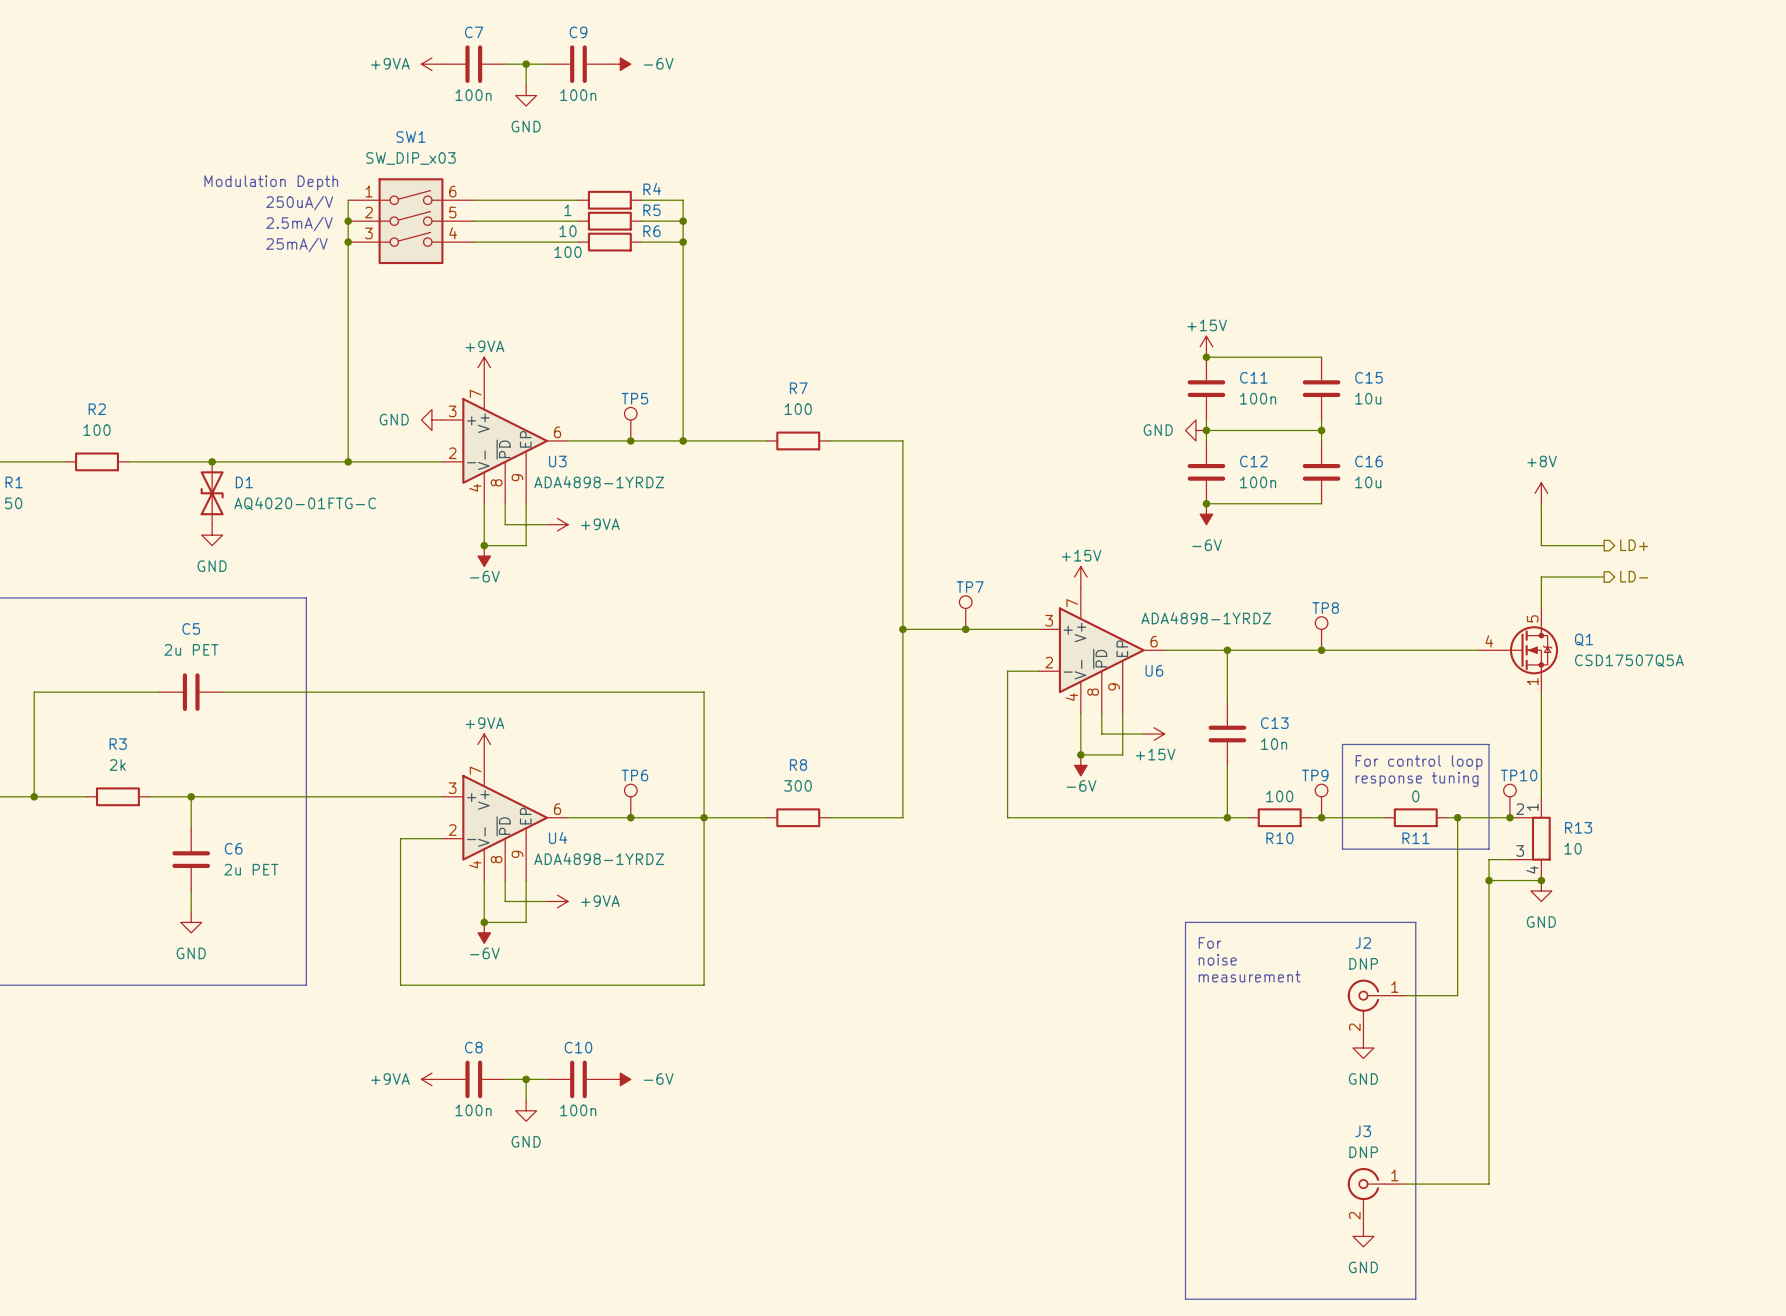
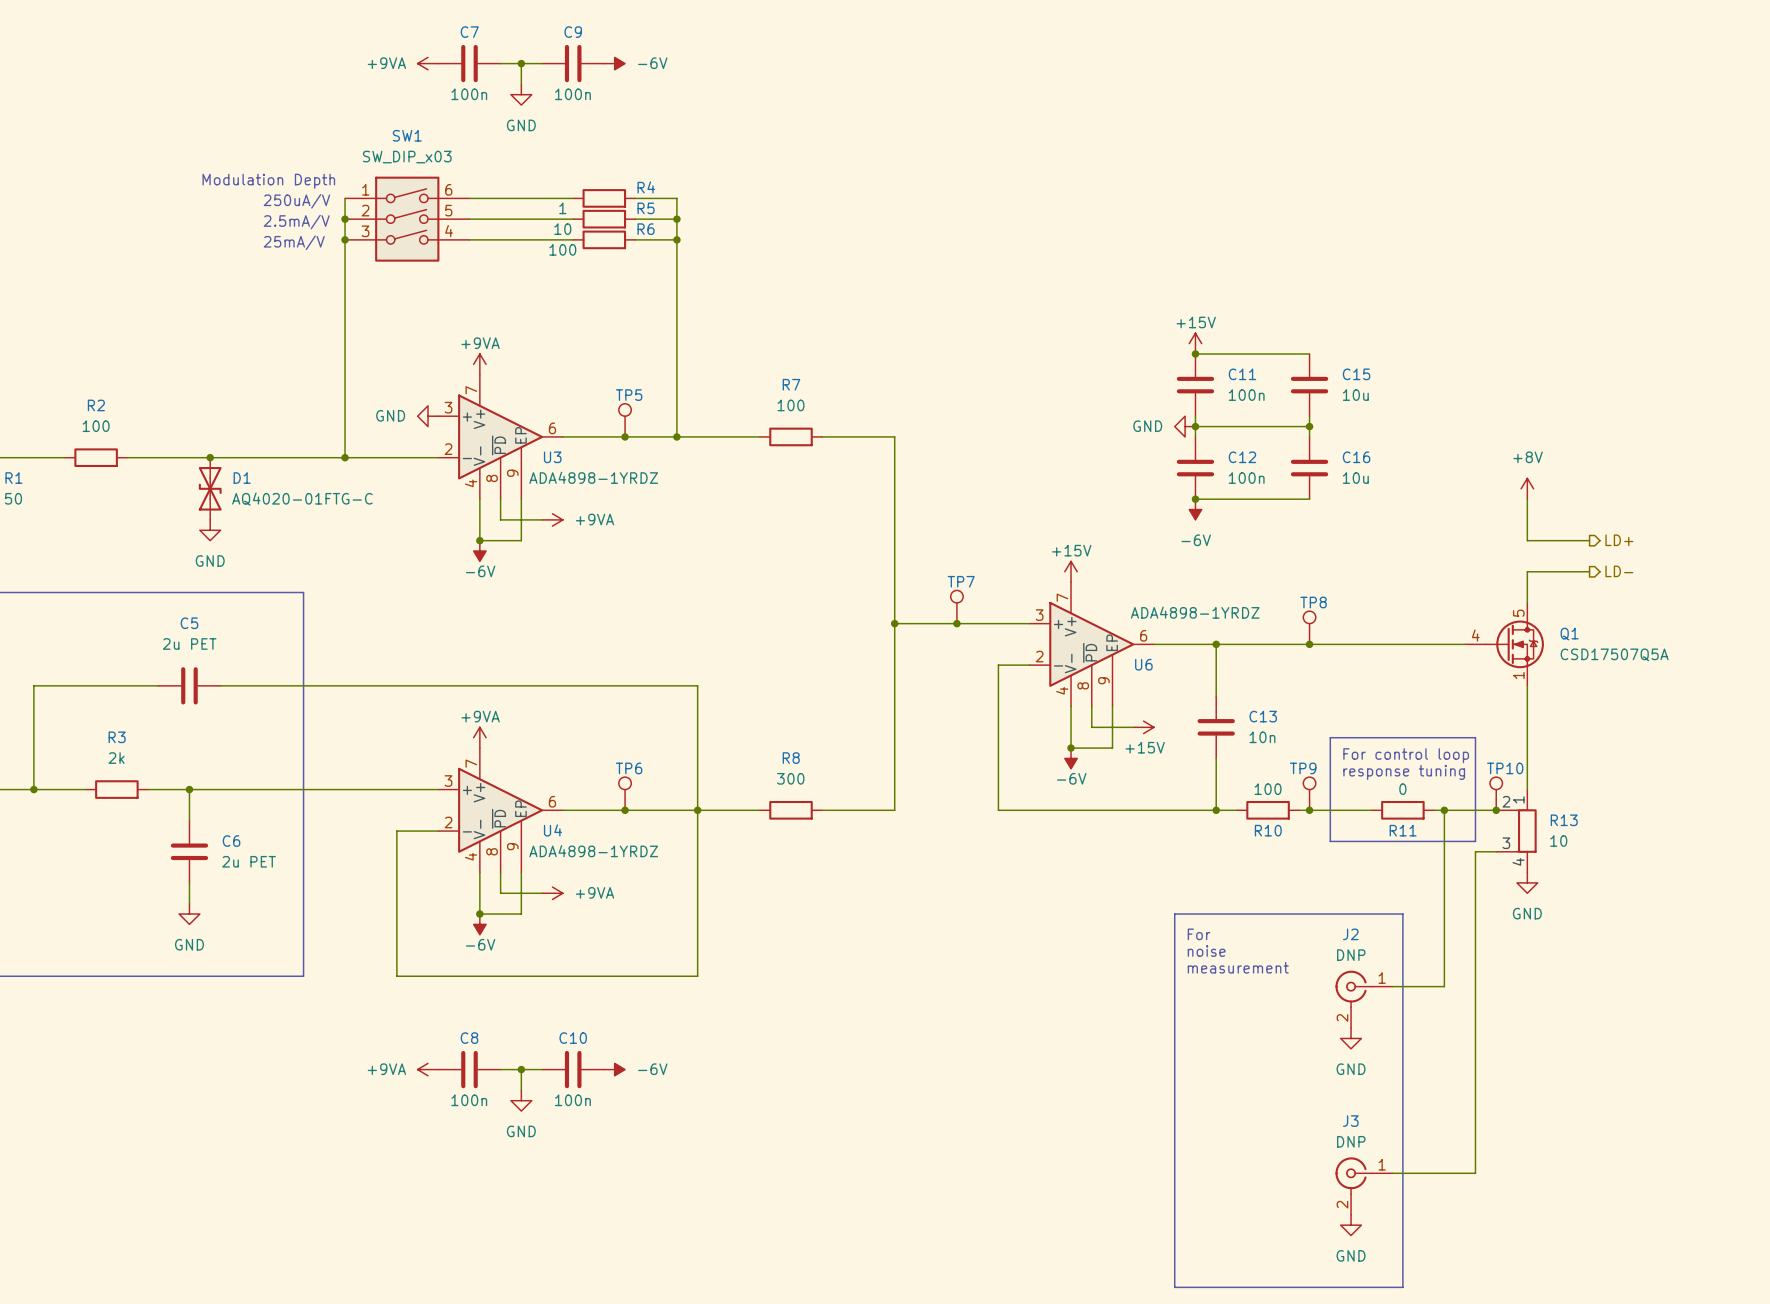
wire: (1489, 880) (1541, 880) -> none
junction: (1489, 880) -> none
junction: (1541, 880) -> none

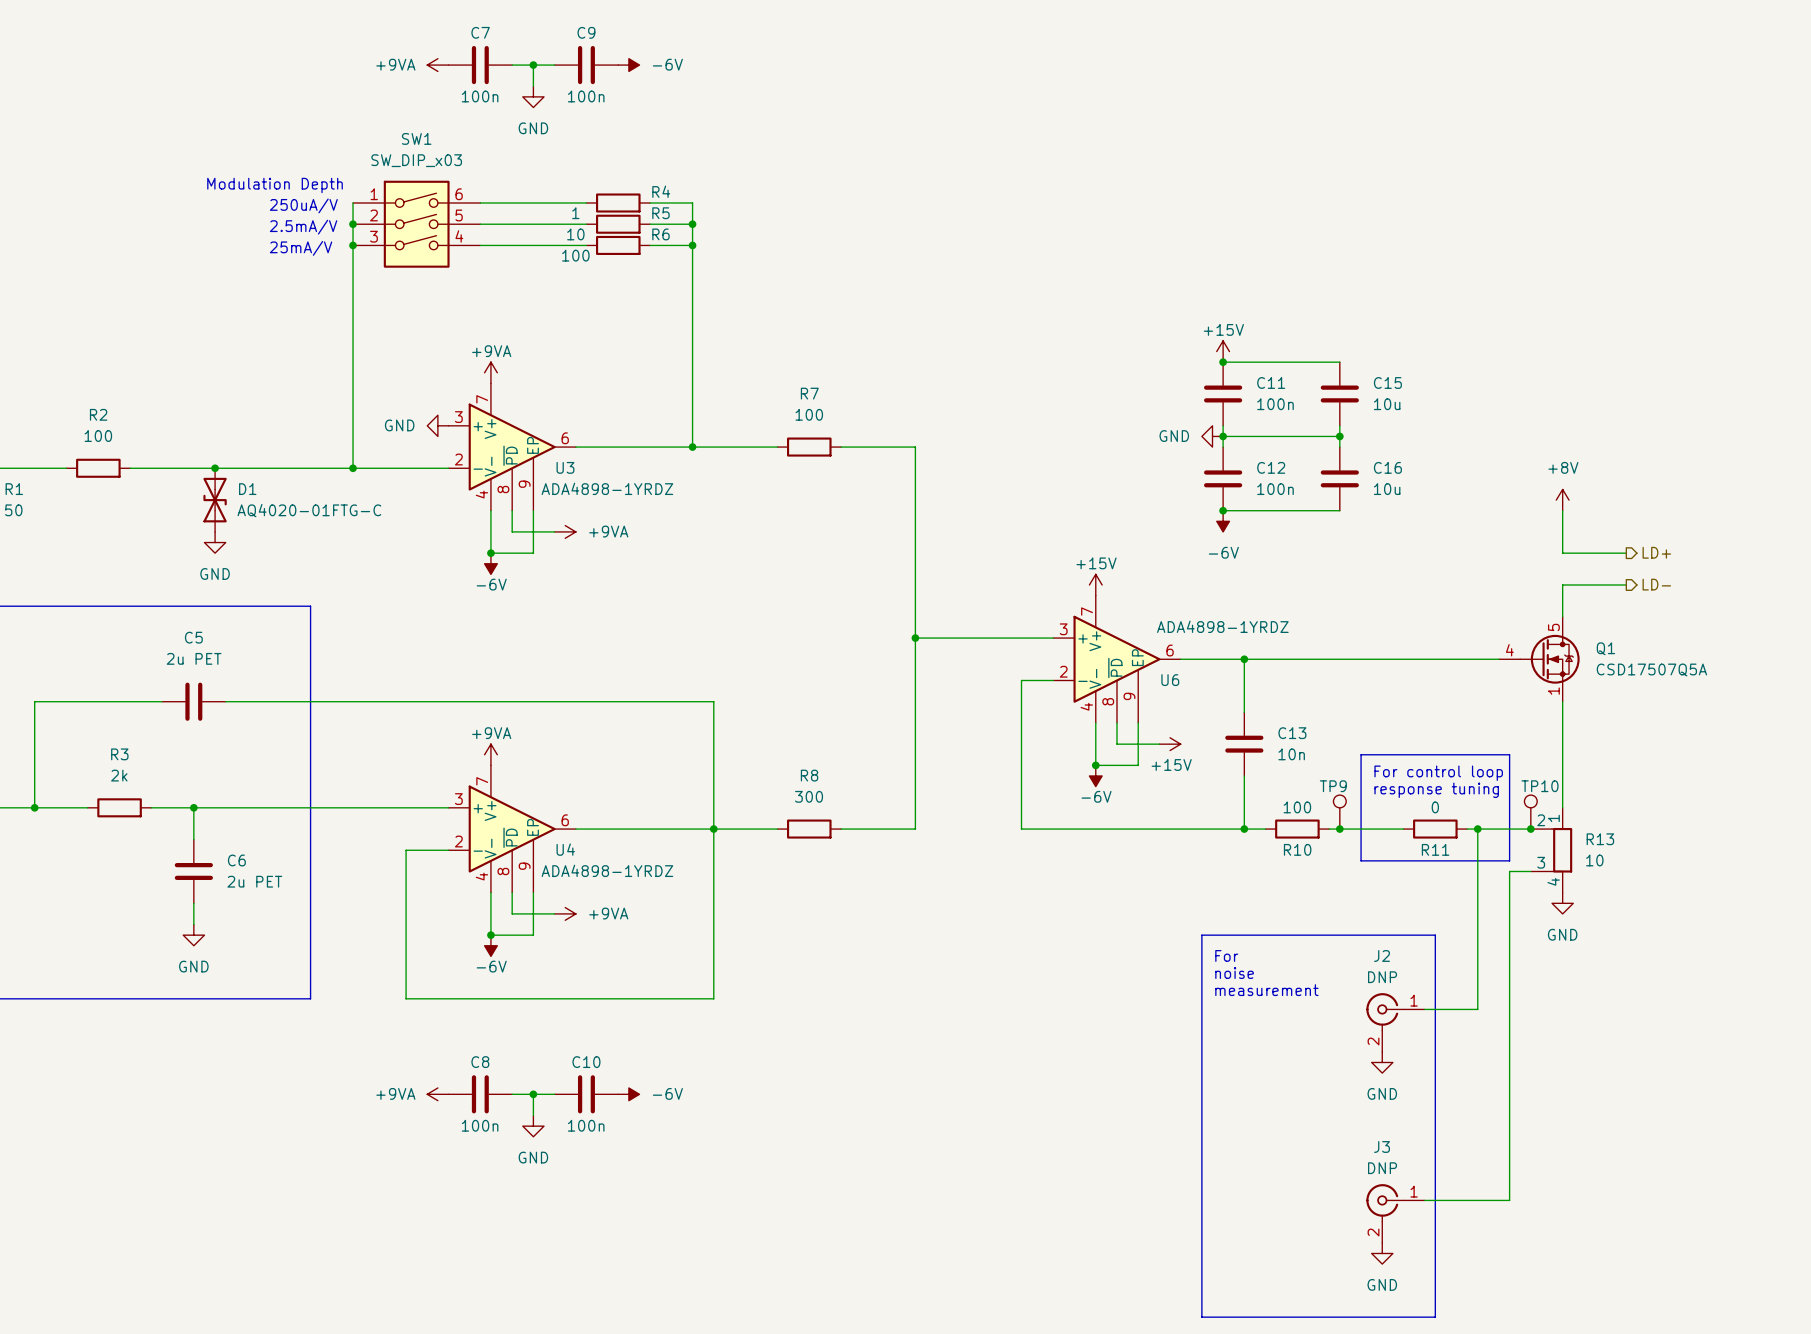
TP5: (625, 420) -> none
junction: (625, 436) -> none
TP7: (956, 607) -> none
junction: (956, 623) -> none
TP8: (1309, 627) -> none
junction: (1309, 644) -> none
TP6: (625, 793) -> none
junction: (625, 810) -> none

